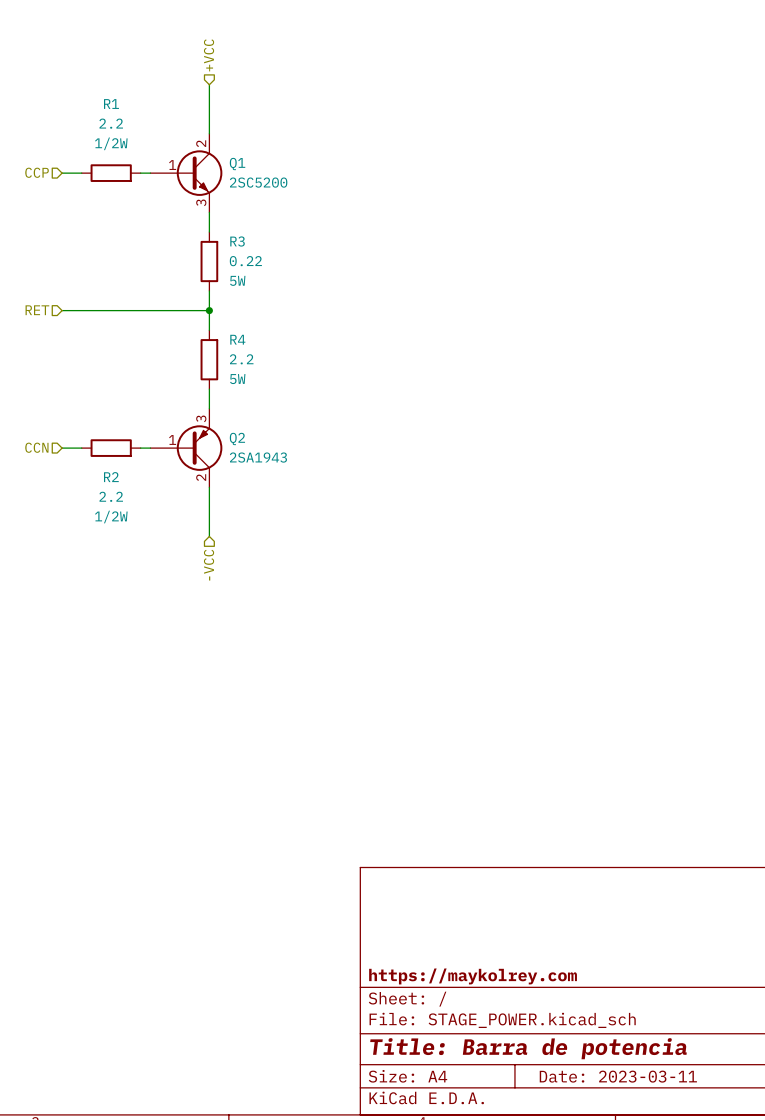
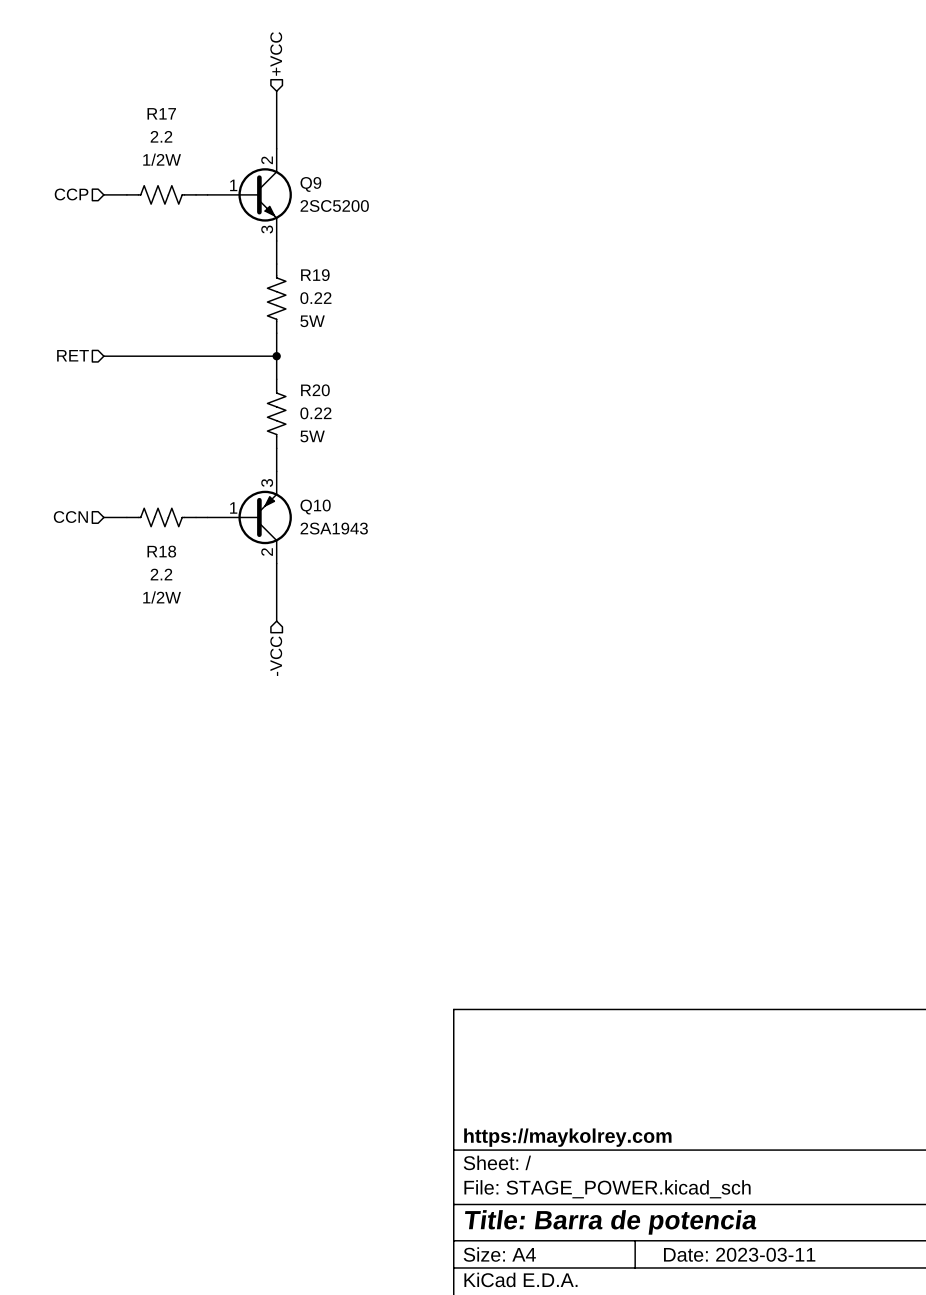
Q1 name: Q1 (237, 164) -> Q9 (310, 184)
R1: 2.2 (111, 173) -> none
R17: none -> 2.2 (161, 194)
R3: 0.22 (209, 261) -> none
R19: none -> 0.22 (276, 298)
R4: 2.2 (209, 359) -> none
R20: none -> 0.22 (276, 413)
Q2 name: Q2 (237, 438) -> Q10 (315, 507)
R2: 2.2 (111, 448) -> none
R18: none -> 2.2 (161, 517)

